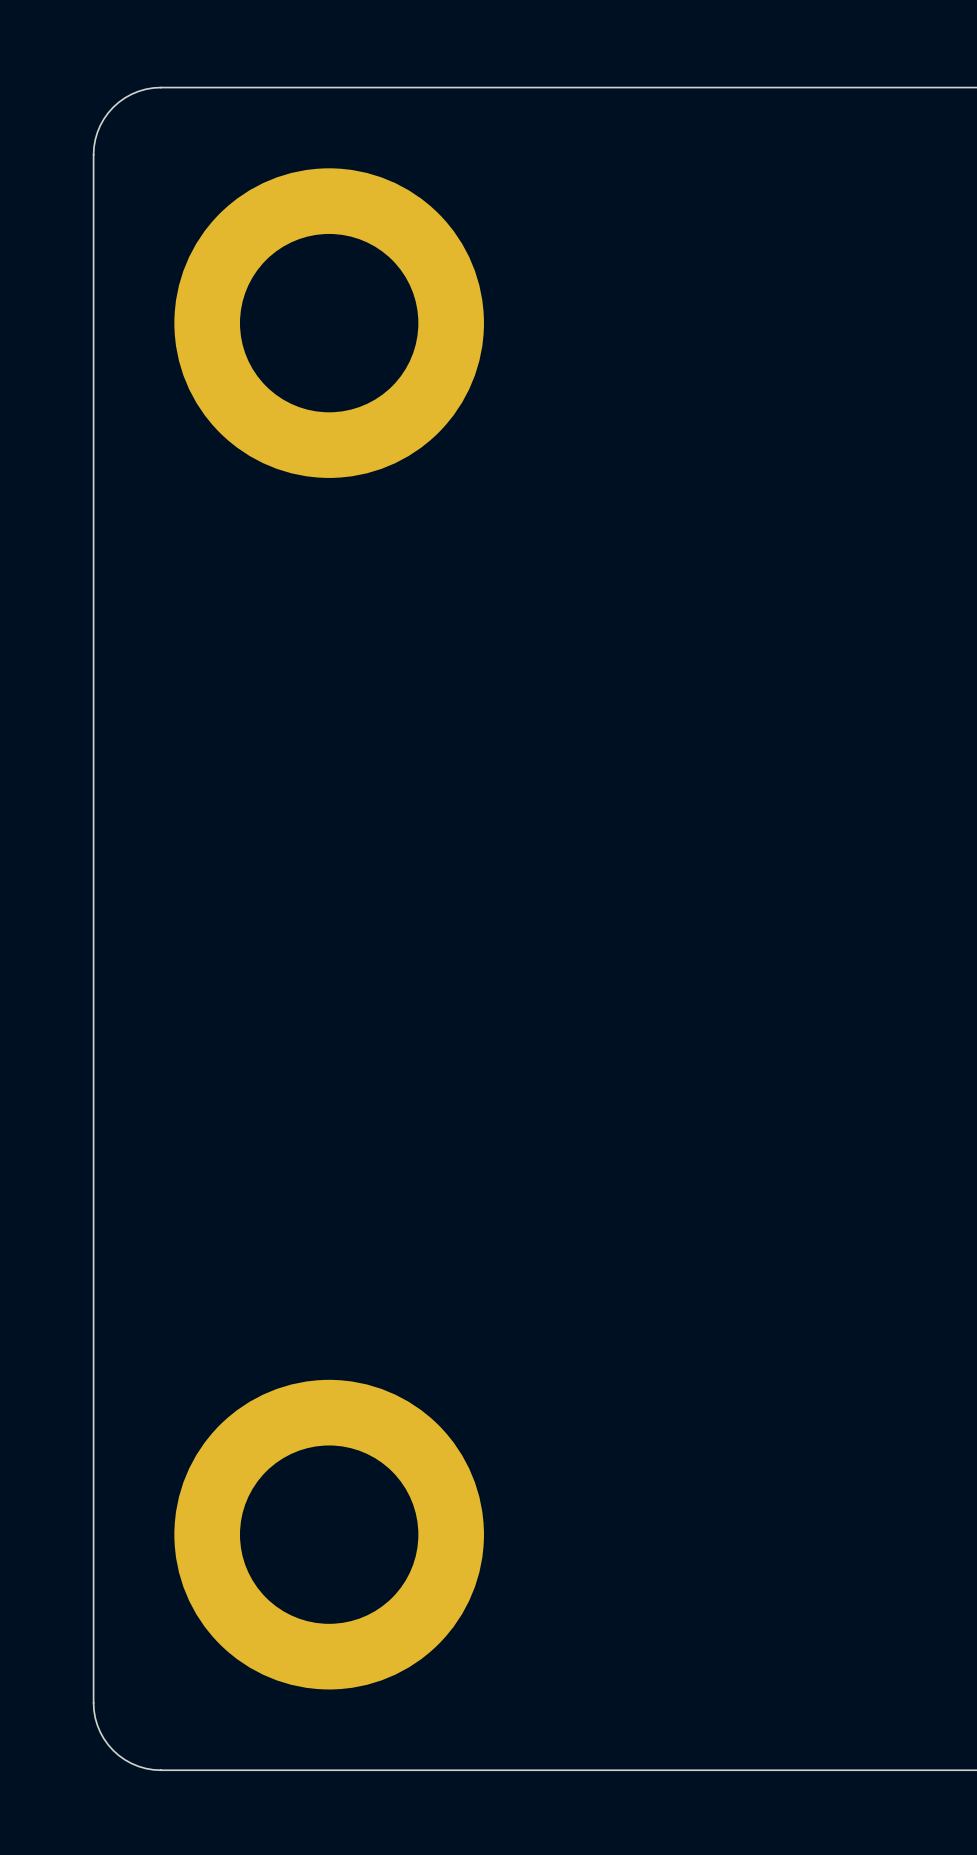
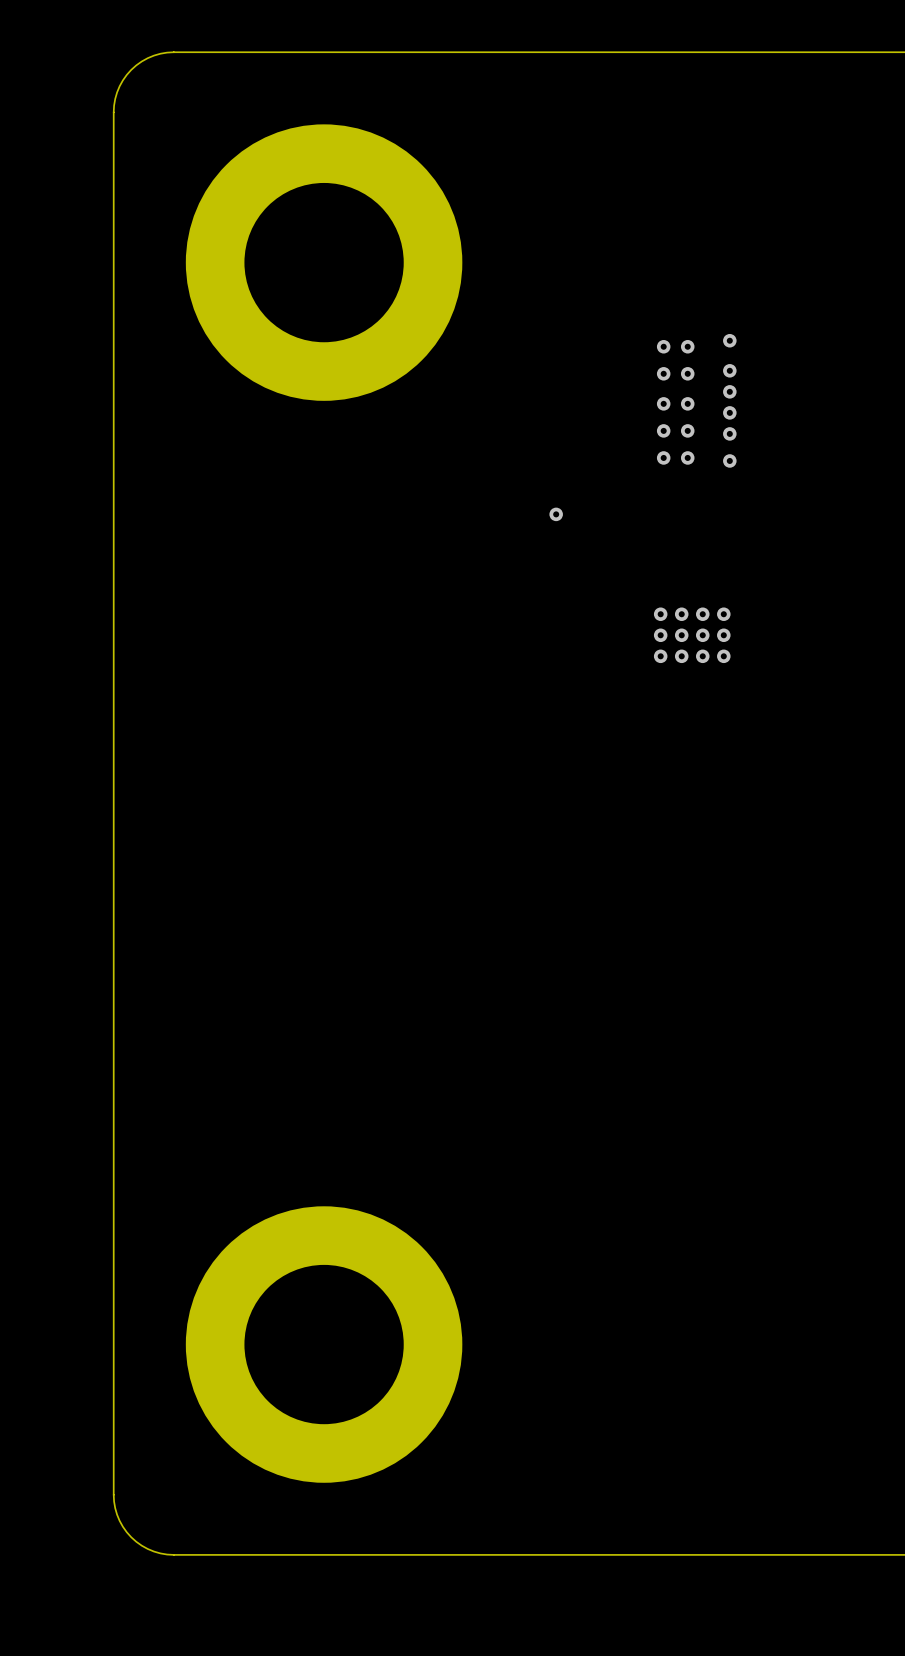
via: none -> (729, 340)
via: none -> (663, 346)
via: none -> (687, 346)
via: none -> (729, 370)
via: none -> (663, 373)
via: none -> (687, 373)
via: none -> (729, 391)
via: none -> (663, 403)
via: none -> (687, 403)
via: none -> (729, 412)
via: none -> (663, 430)
via: none -> (687, 430)
via: none -> (729, 433)
via: none -> (663, 457)
via: none -> (687, 457)
via: none -> (729, 460)
via: none -> (556, 514)
via: none -> (660, 614)
via: none -> (681, 614)
via: none -> (702, 614)
via: none -> (723, 614)
via: none -> (660, 635)
via: none -> (681, 635)
via: none -> (702, 635)
via: none -> (723, 635)
via: none -> (660, 656)
via: none -> (681, 656)
via: none -> (702, 656)
via: none -> (723, 656)

